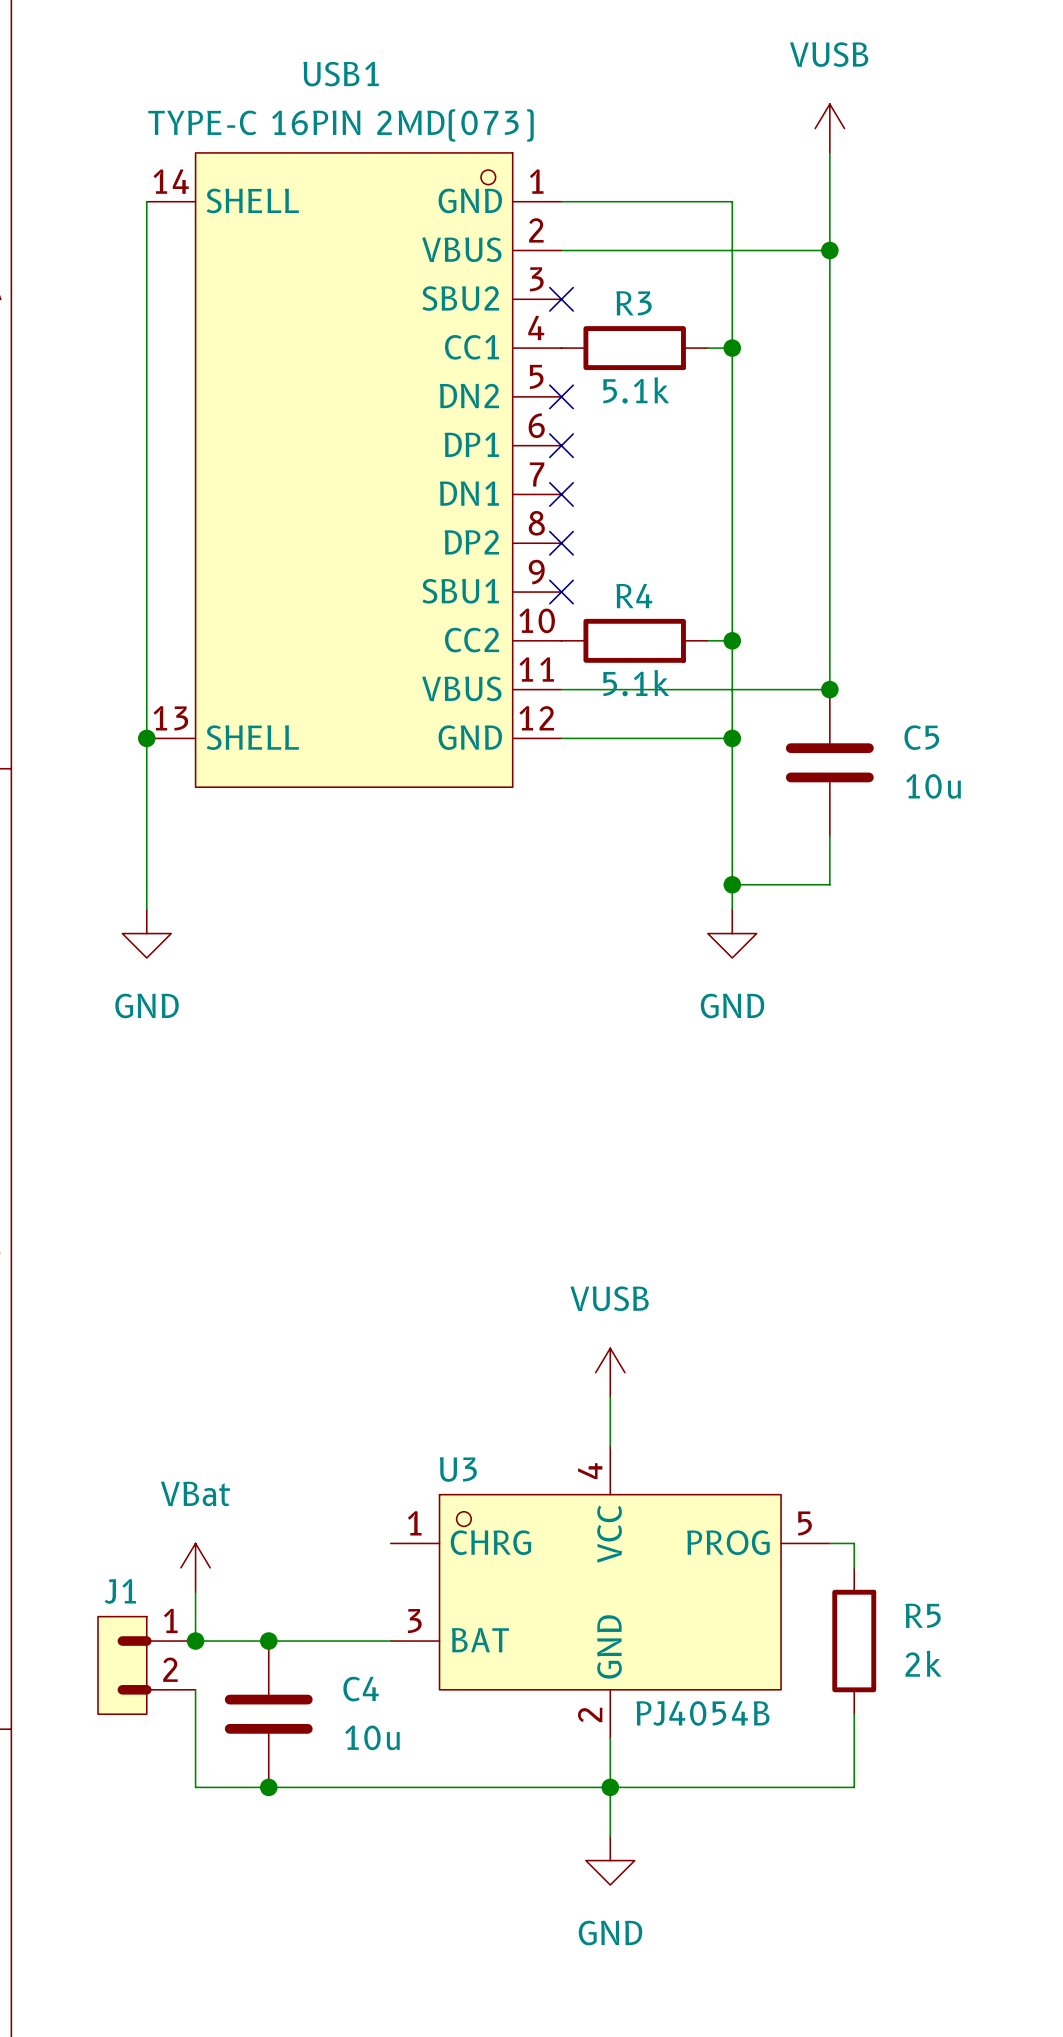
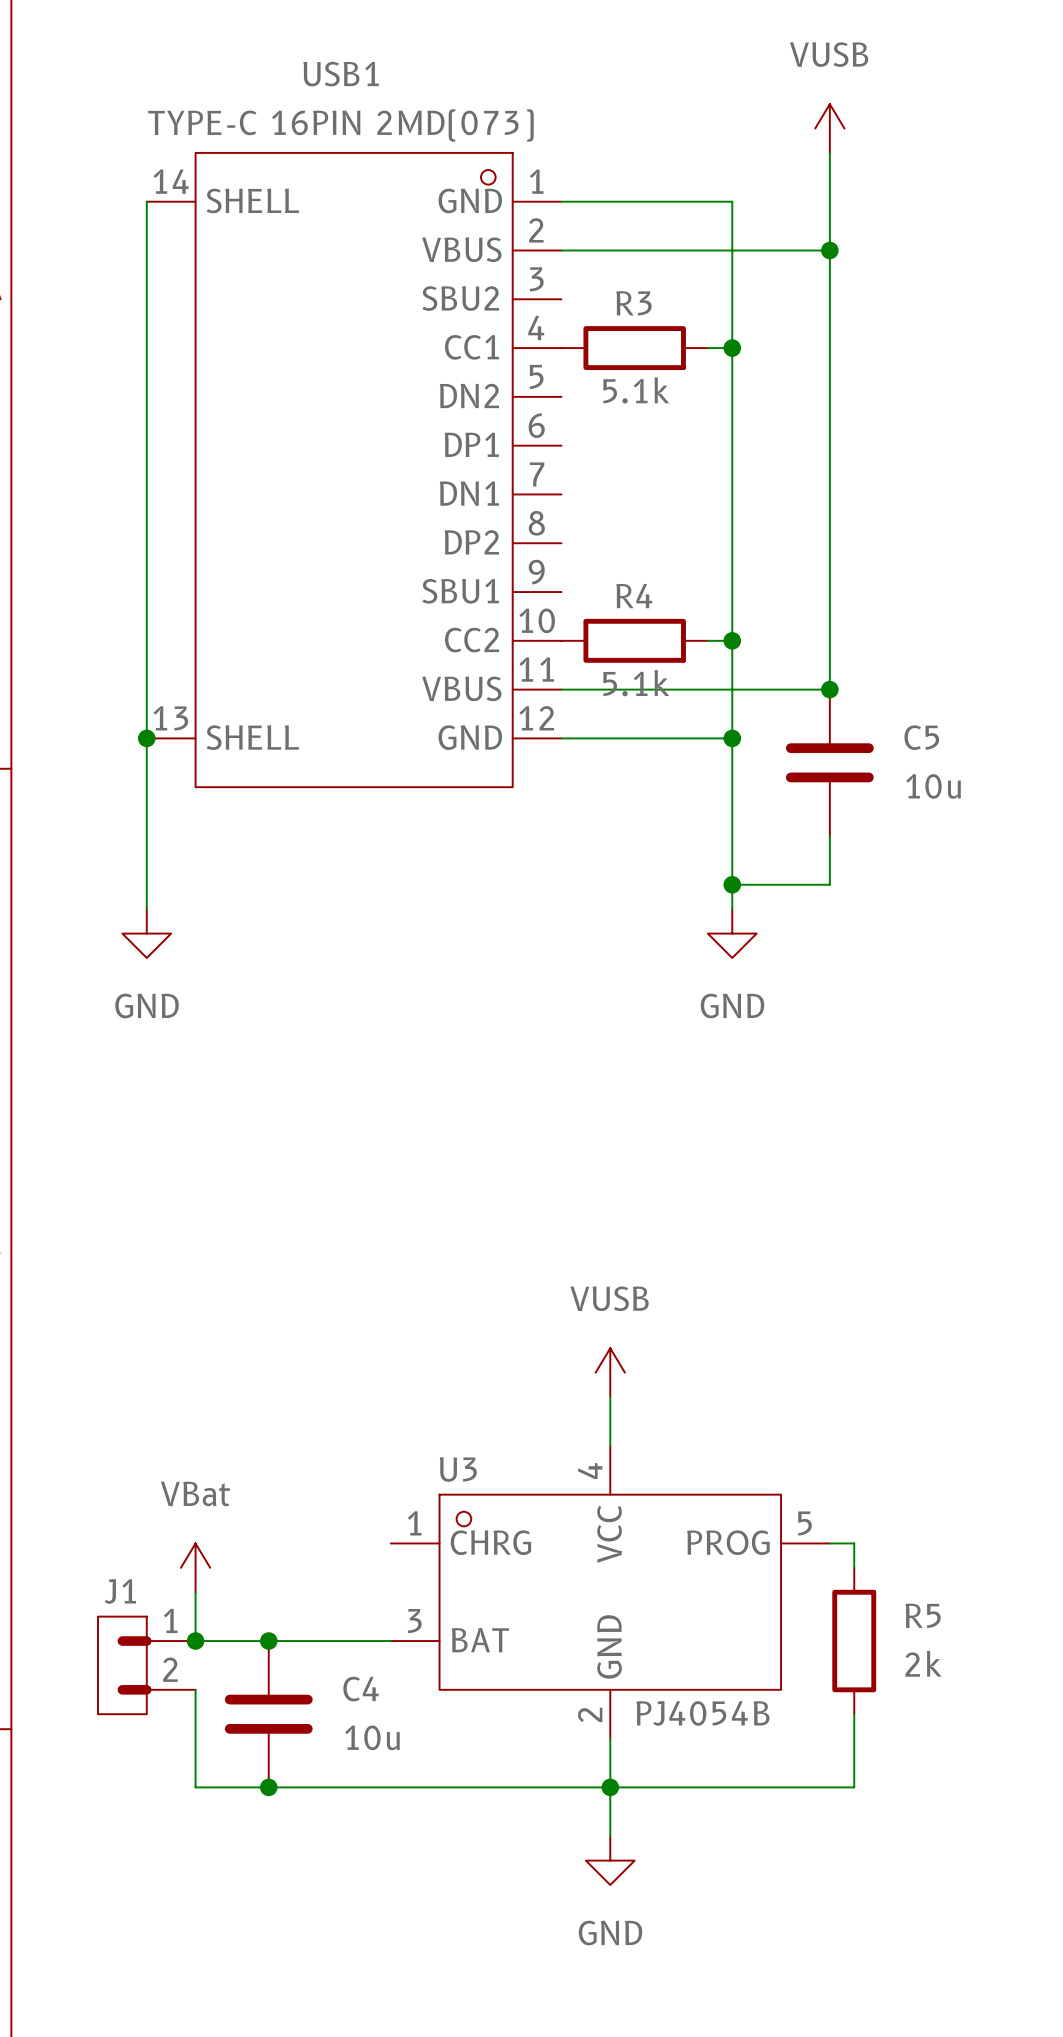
no-connect mark: (561, 299) -> none
no-connect mark: (561, 396) -> none
no-connect mark: (561, 445) -> none
no-connect mark: (561, 494) -> none
no-connect mark: (561, 543) -> none
no-connect mark: (561, 592) -> none

